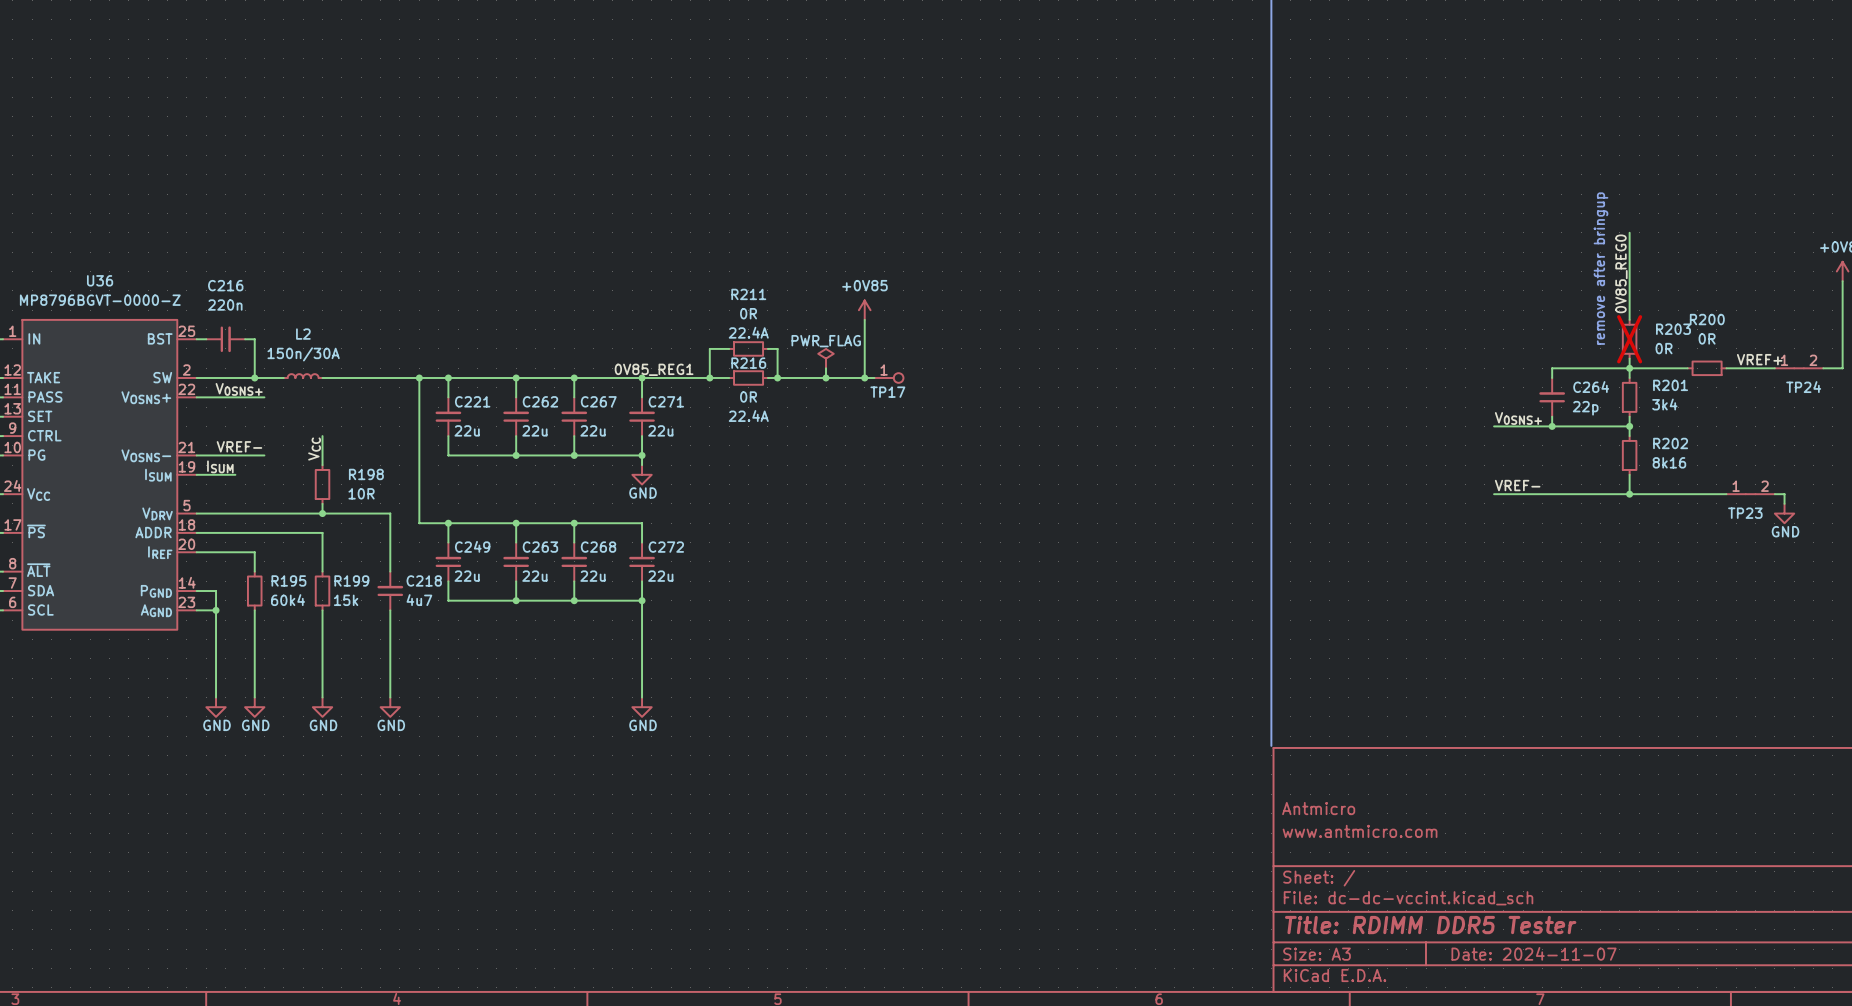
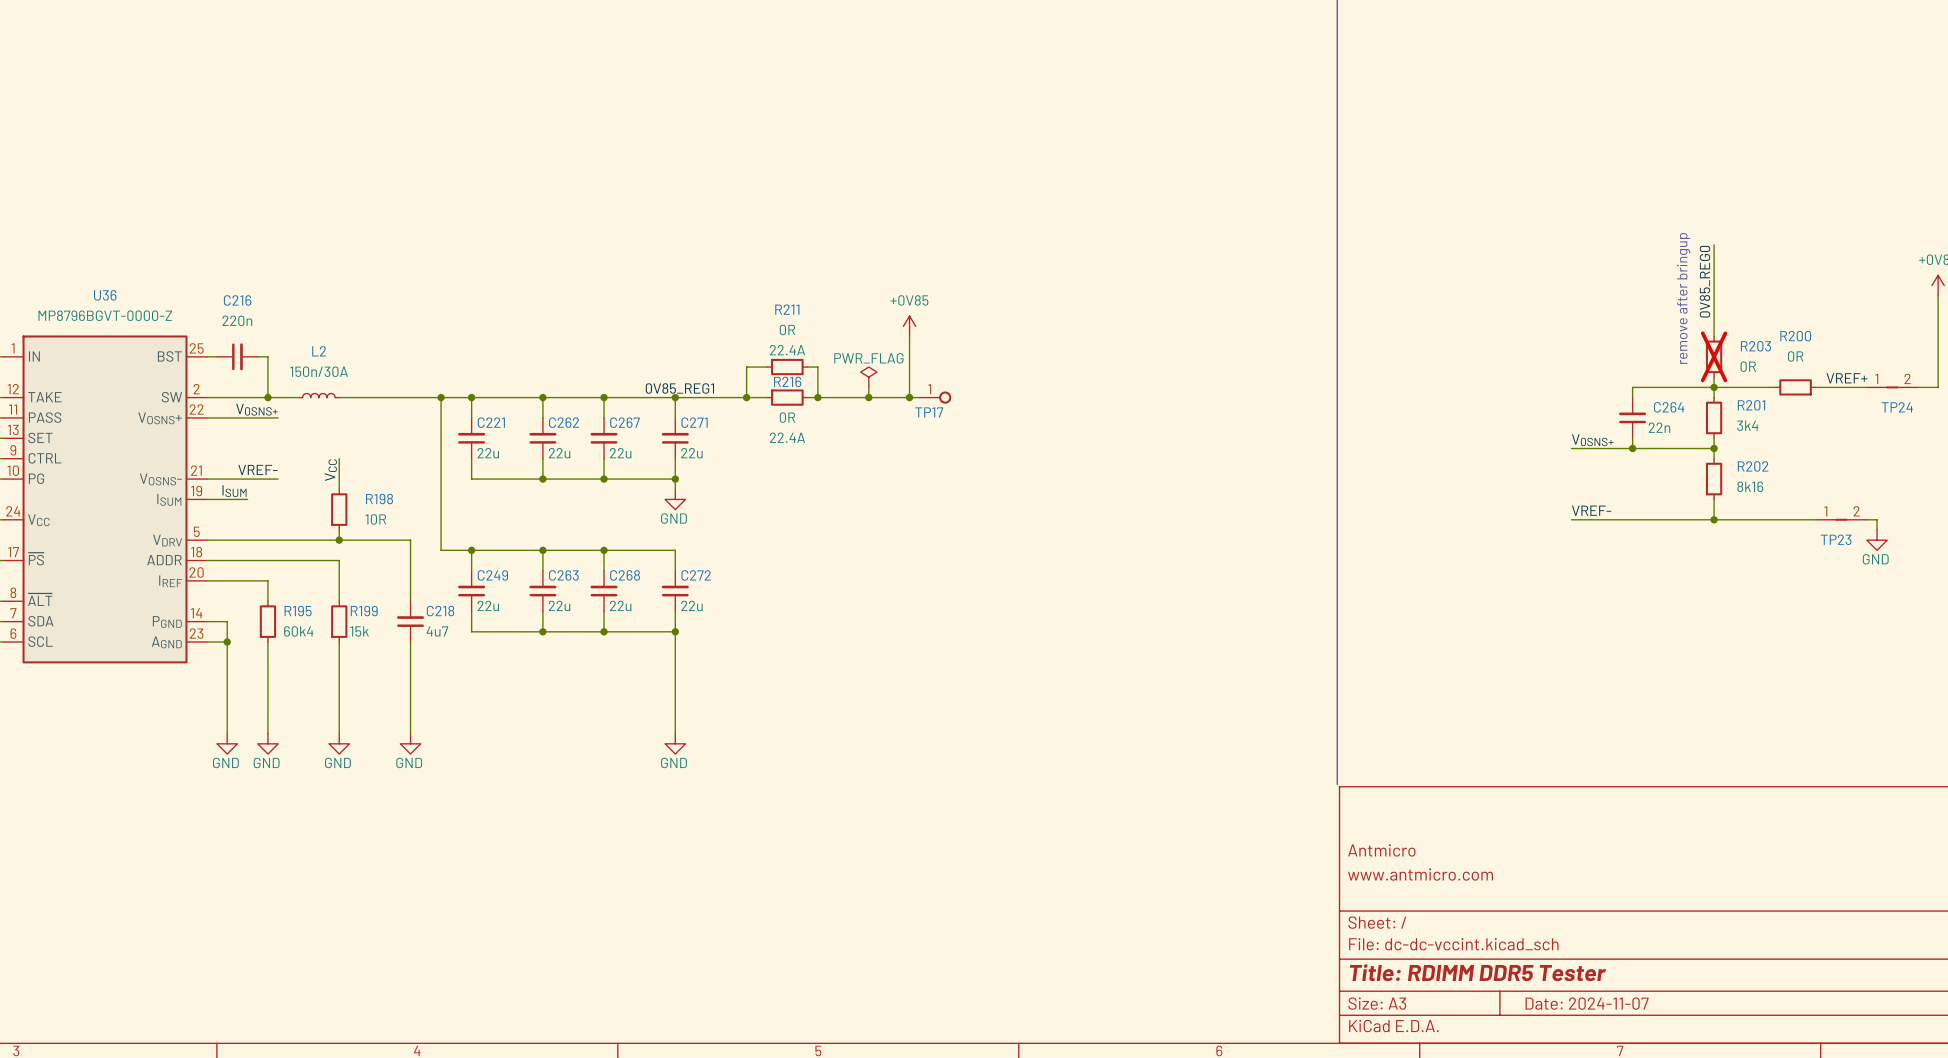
C264 text: 22p (1585, 408) -> 22n (1659, 427)

